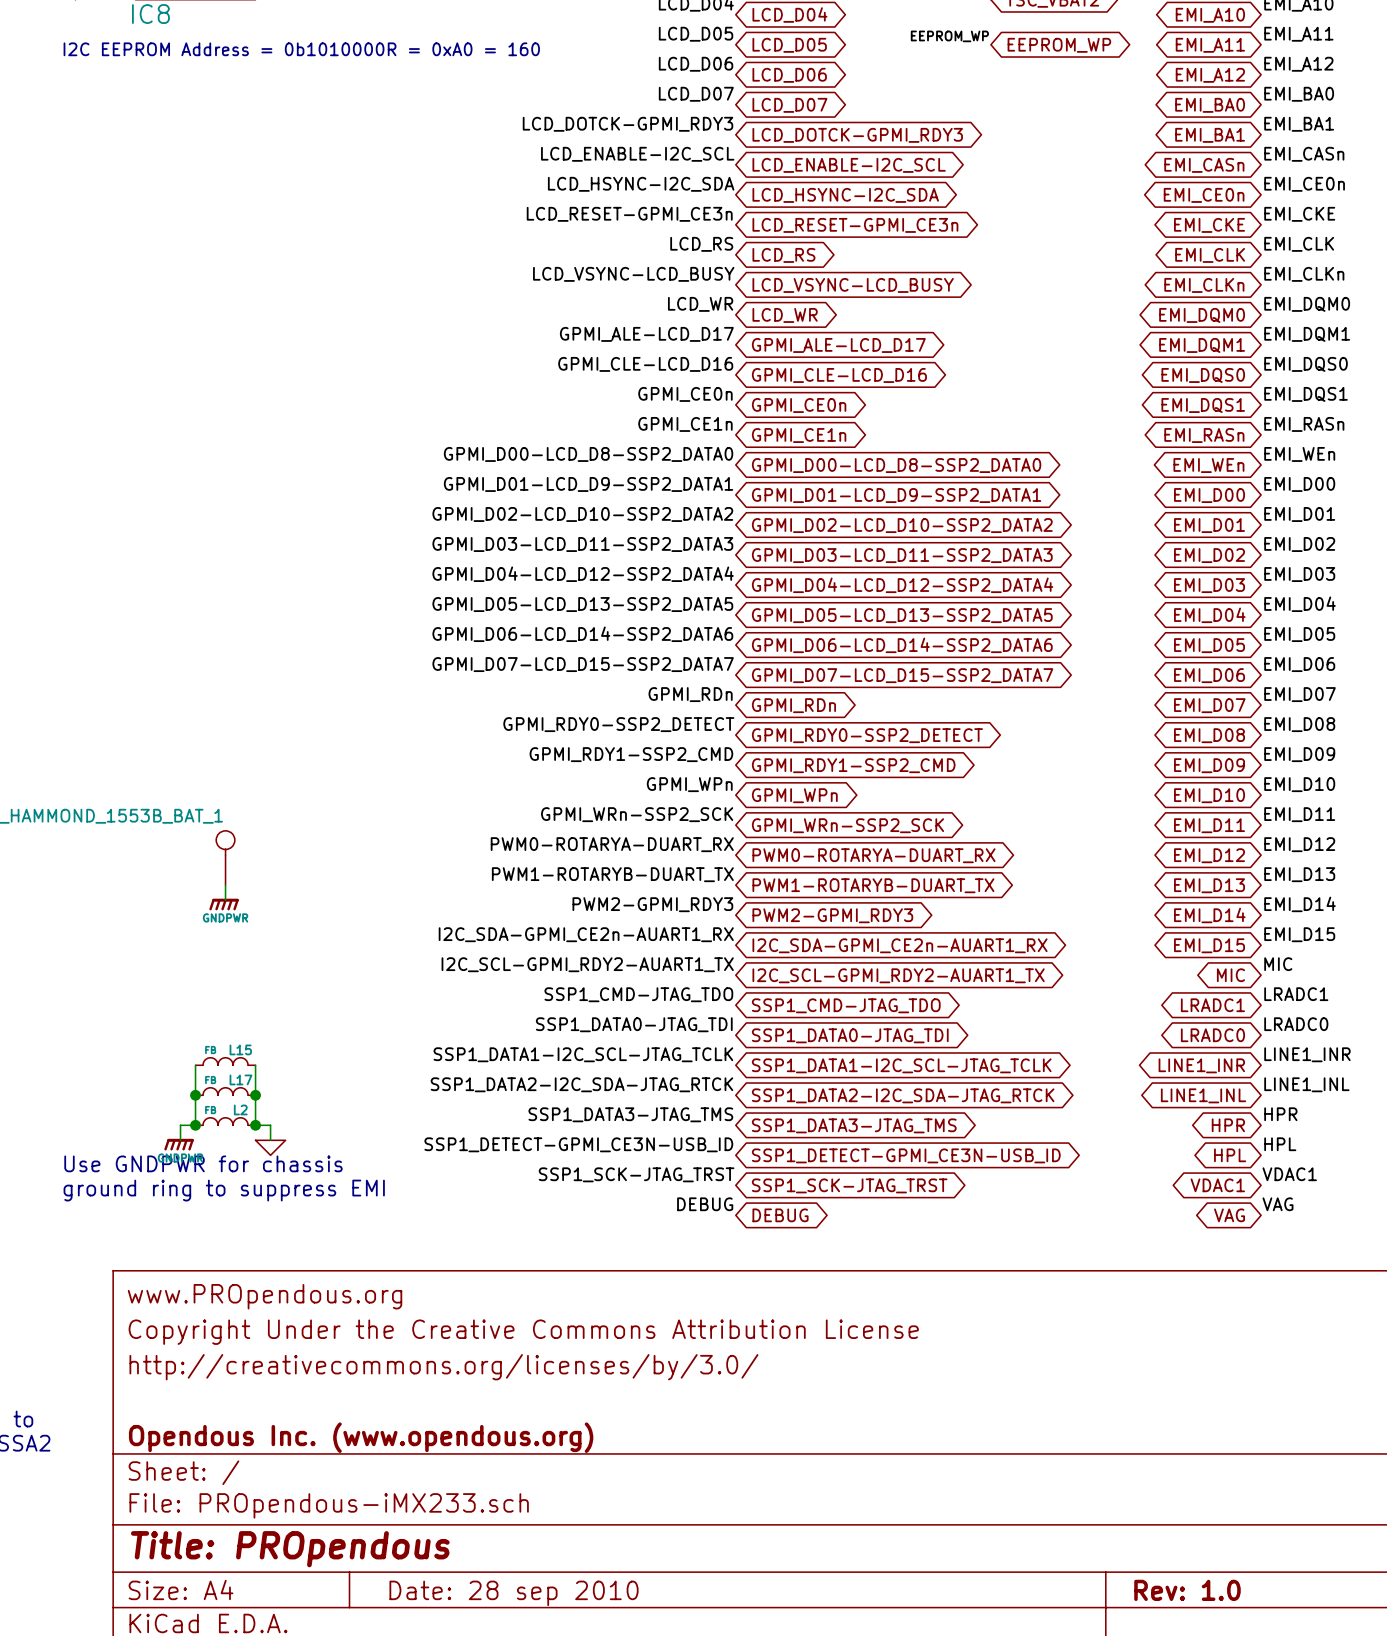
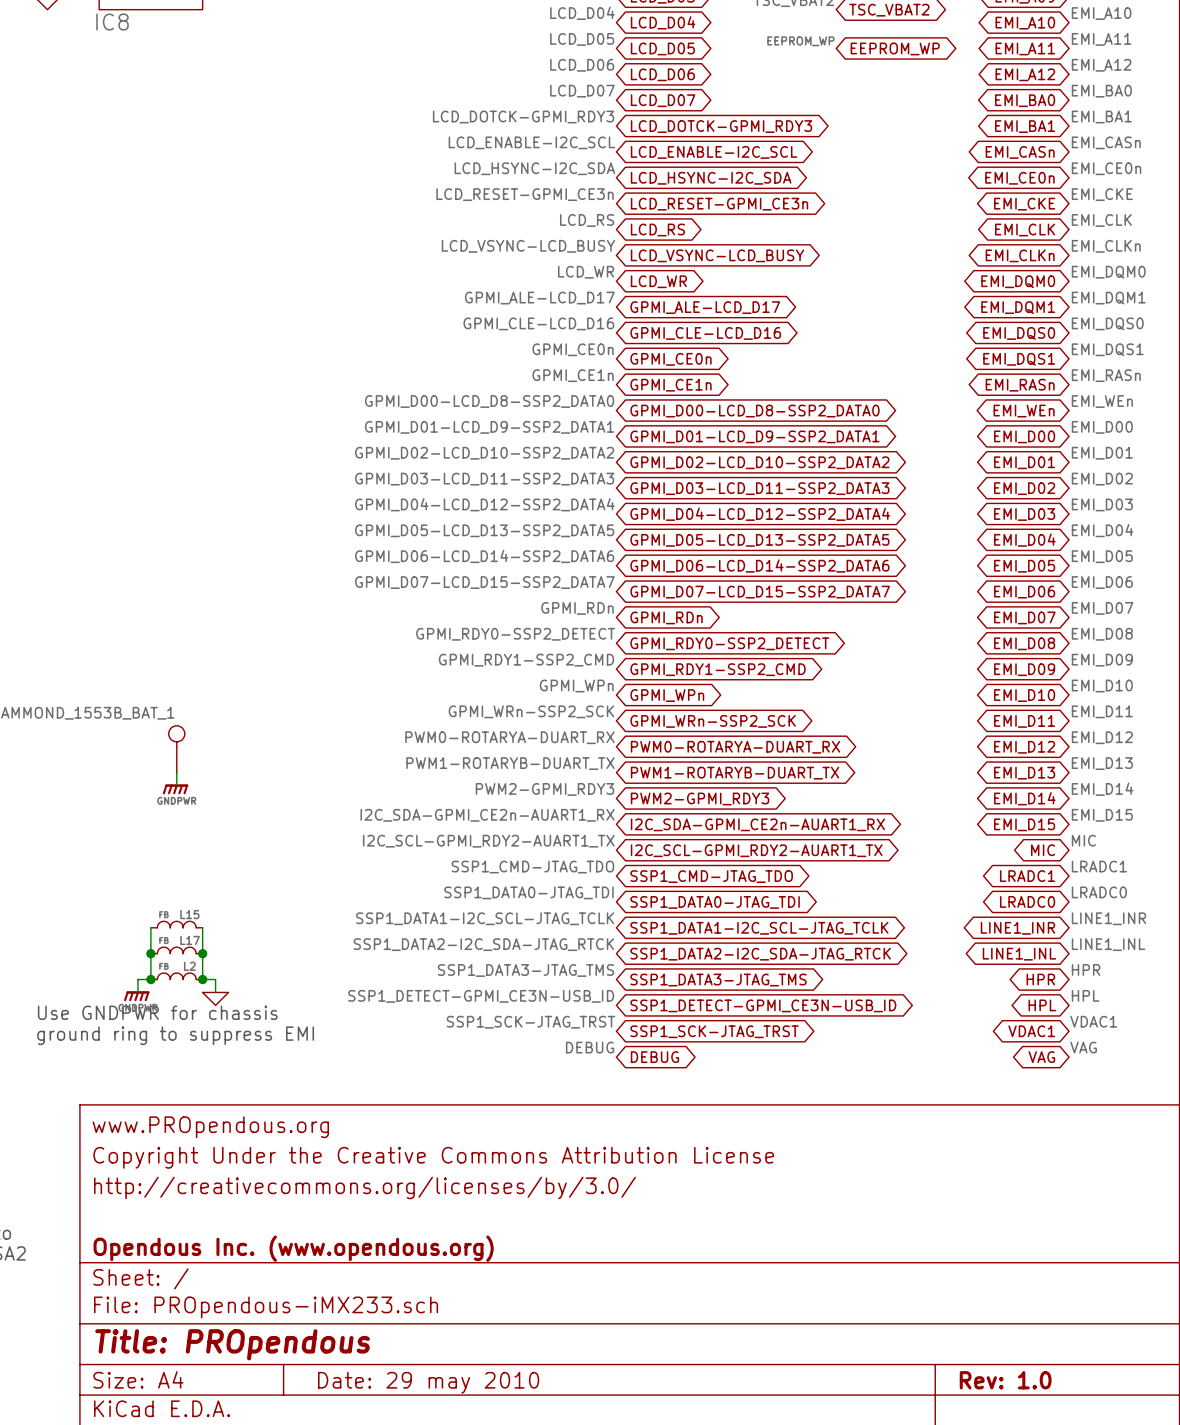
text: I2C EEPROM Address = 0b1010000R = 0xA0 = 160 (301, 49) -> none
title block: Date: 28 sep 2010 (514, 1593) -> Date: 29 may 2010 (428, 1382)

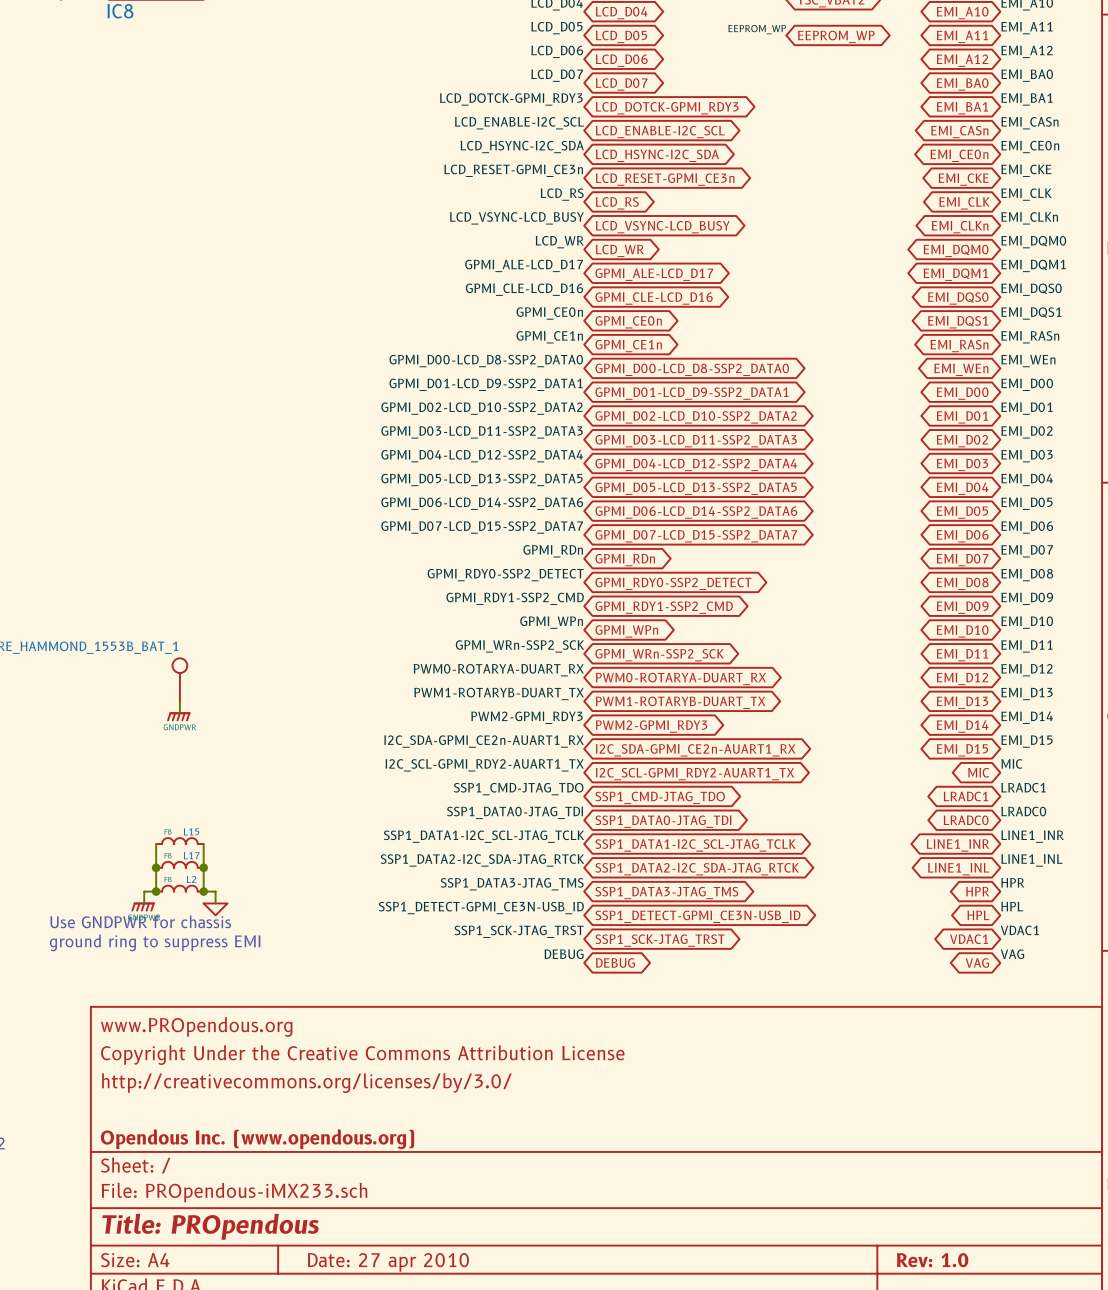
title block: Date: 29 may 2010 (428, 1382) -> Date: 27 apr 2010 (388, 1262)

